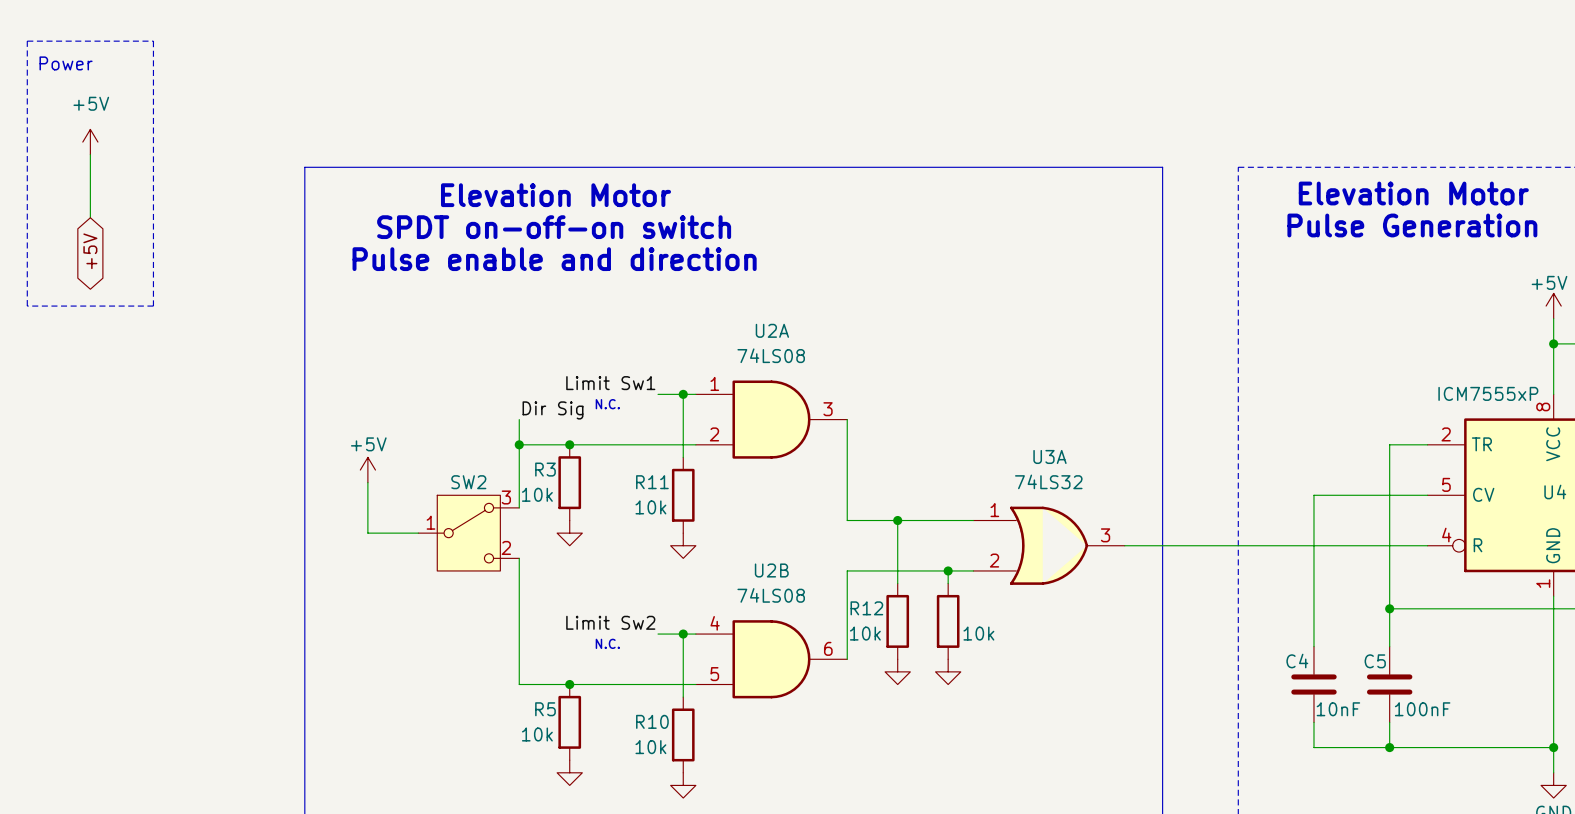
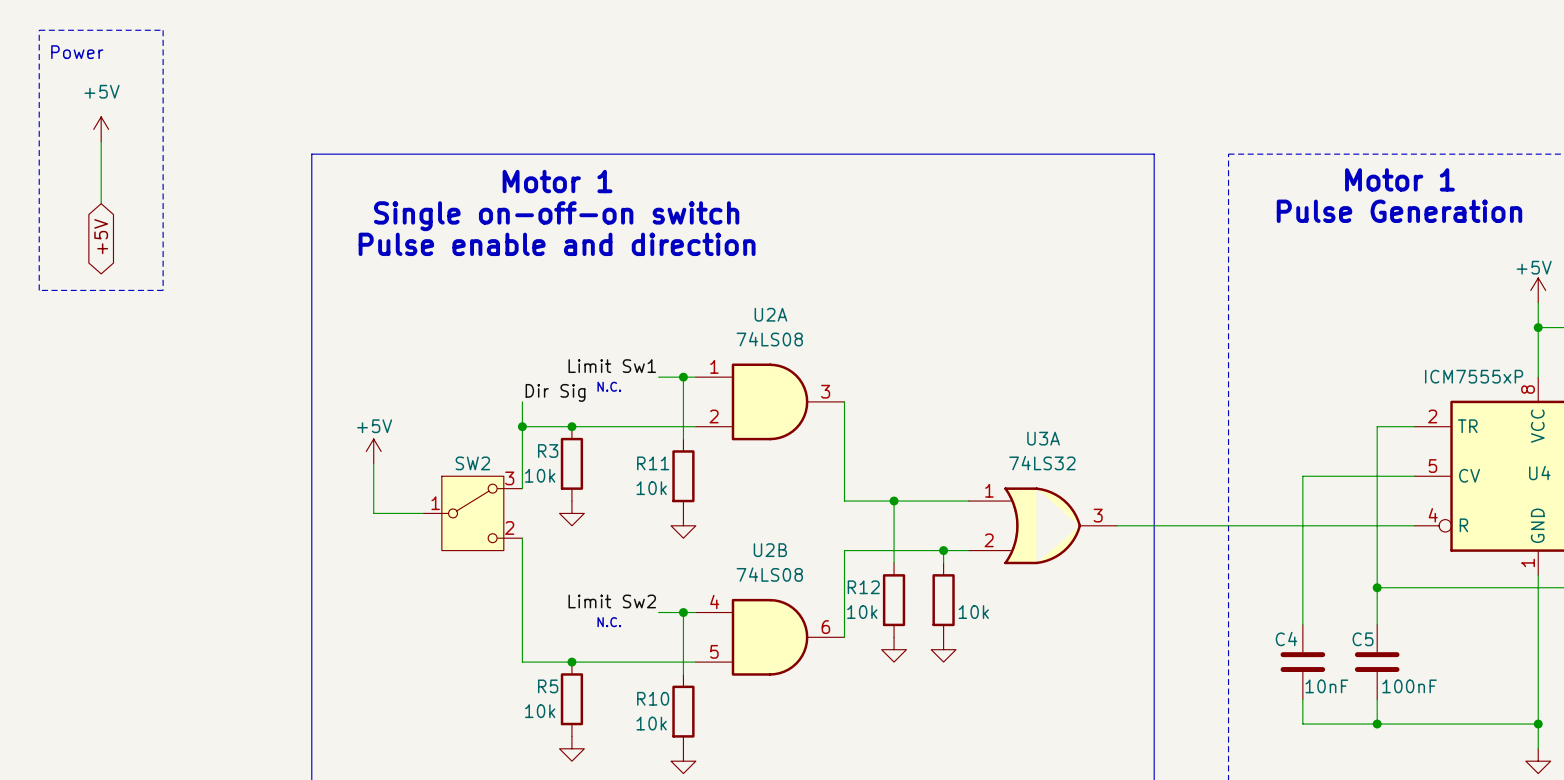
text: Elevation Motor (1413, 193) -> Motor 1 (1399, 179)
text: Elevation Motor (556, 195) -> Motor 1 (557, 181)
text: SPDT on-off-on switch (554, 227) -> Single on-off-on switch (556, 216)

